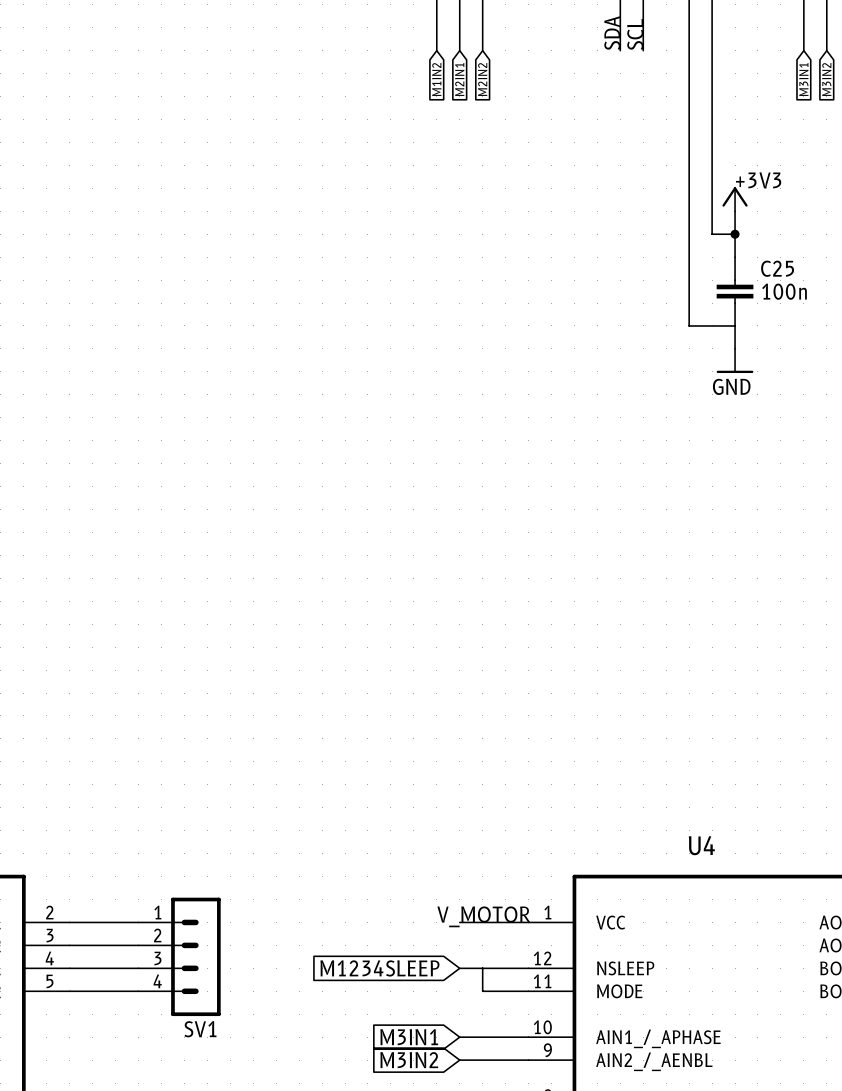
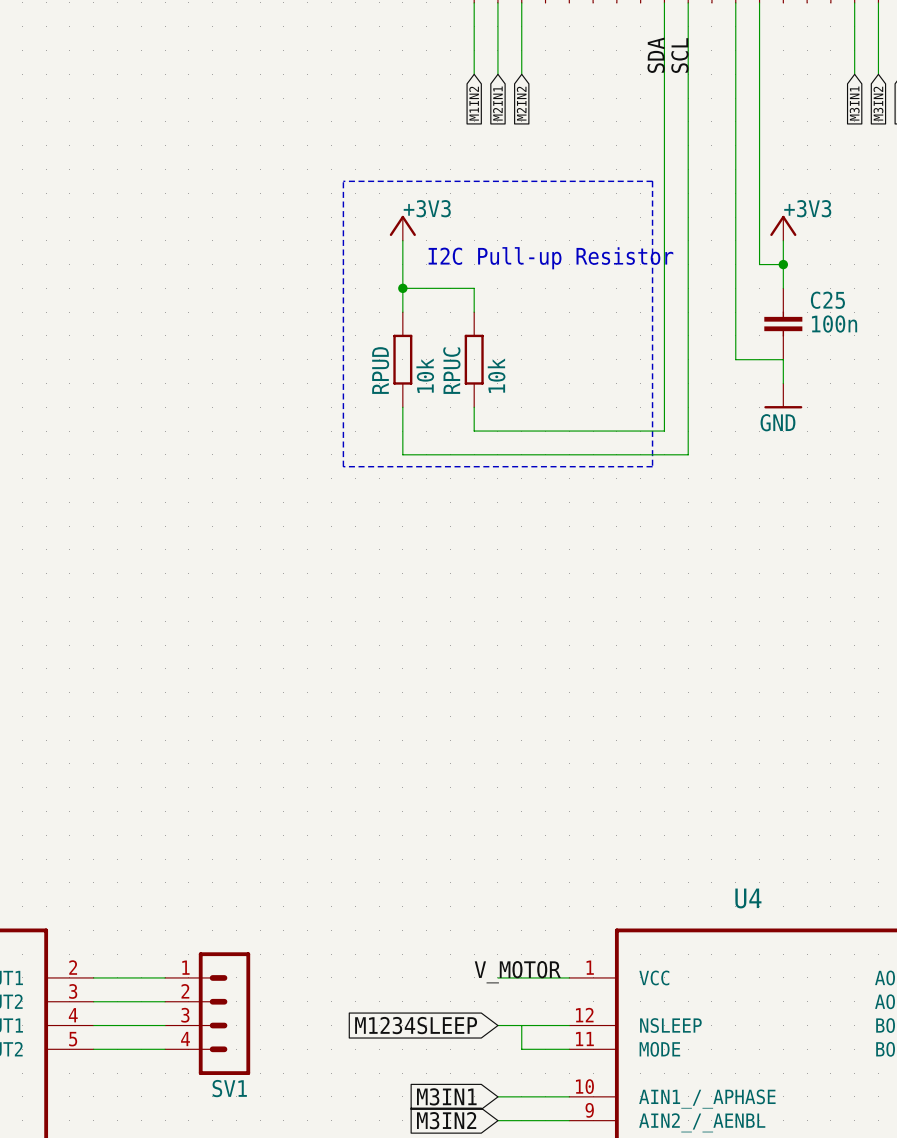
wire: none -> (664, 74) (664, 431) (474, 431) (474, 407)
wire: none -> (688, 74) (688, 454) (402, 454) (402, 407)
line: none -> (343, 181) (343, 466) (652, 466) (652, 181) (343, 181)
power symbol: none -> +3V3 (402, 228)
wire: none -> (402, 240) (402, 312)
text: none -> I2C Pull-up Resistor (550, 258)
wire: none -> (402, 288) (474, 288) (474, 312)
junction: none -> (402, 288)
RPUD: none -> 10k (402, 359)
RPUC: none -> 10k (474, 359)

